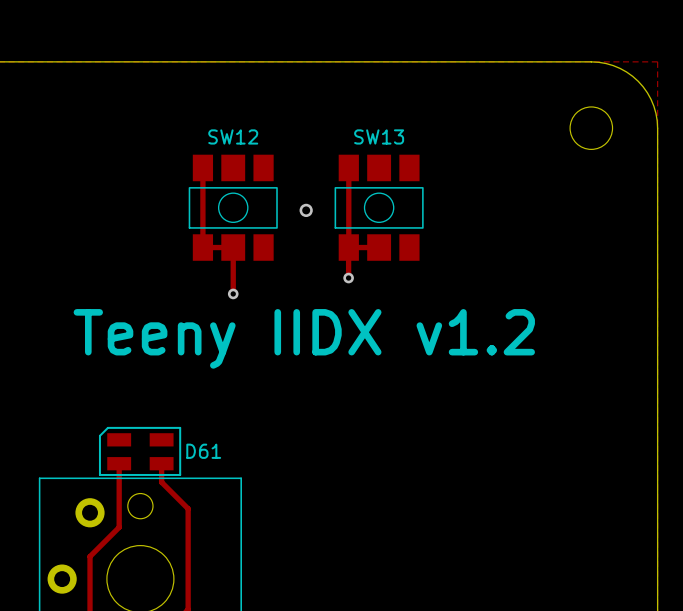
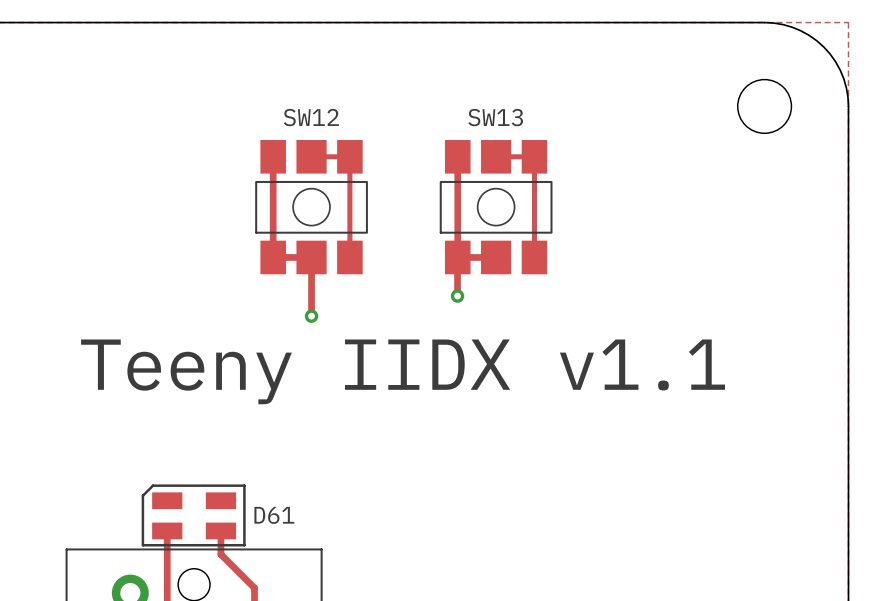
track: none -> (311, 156) (349, 156) (349, 257)
track: none -> (496, 156) (534, 156) (534, 257)
via: (306, 210) -> none
text: Teeny IIDX v1.2 (304, 338) -> Teeny IIDX v1.1 (403, 371)

